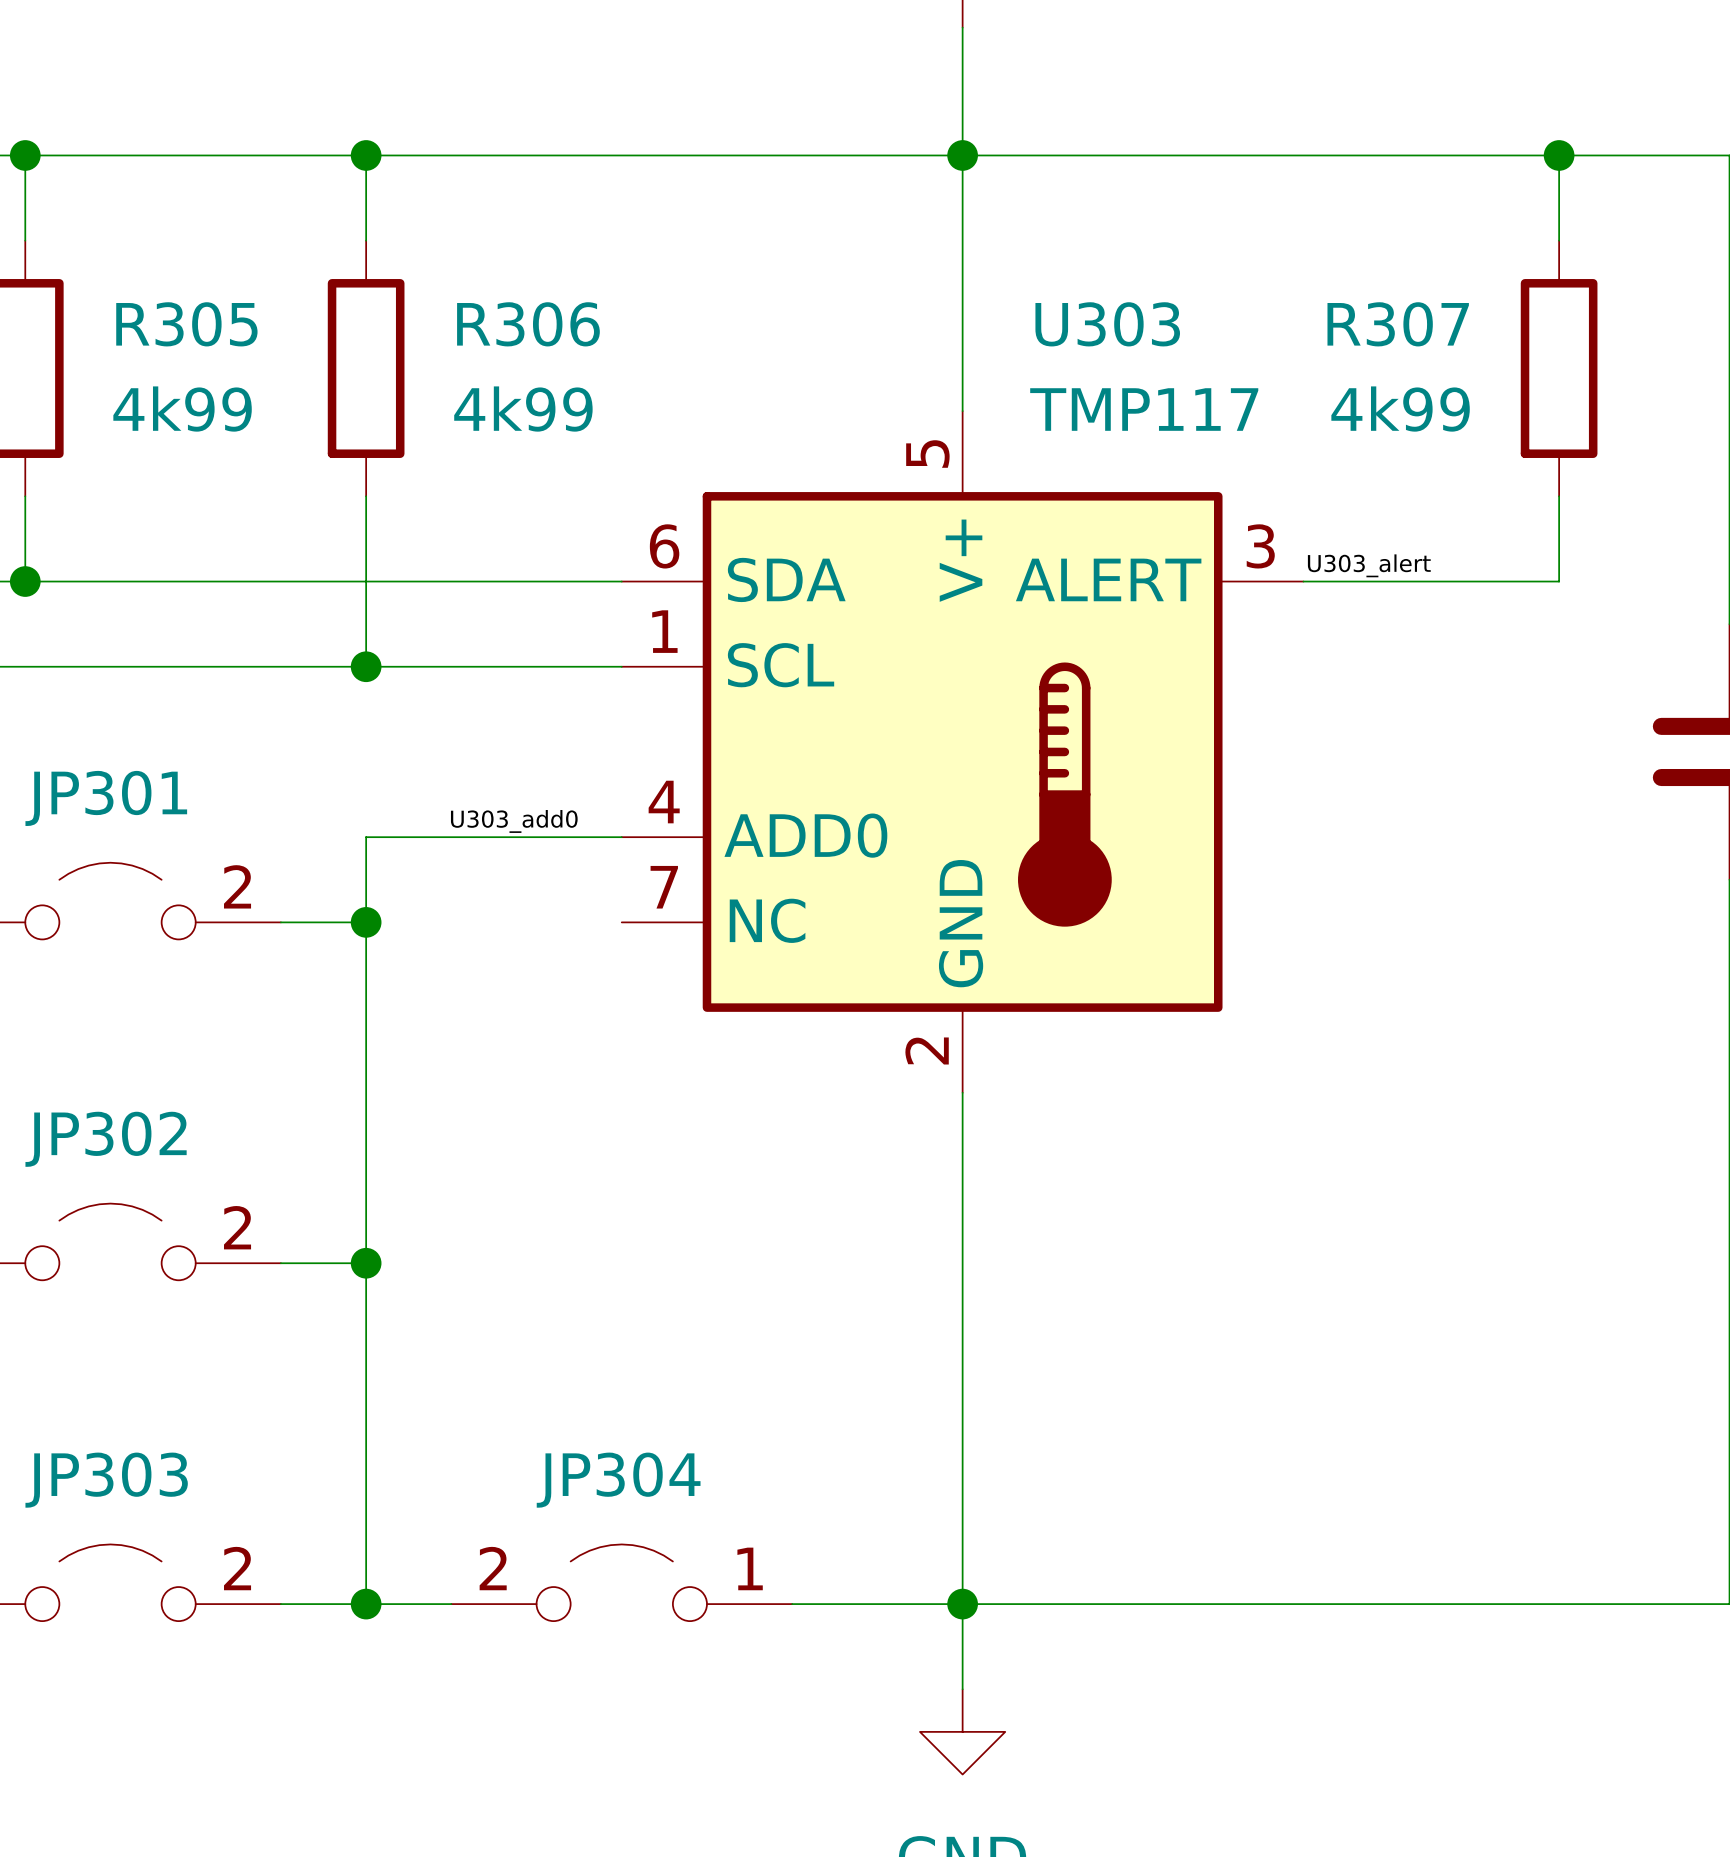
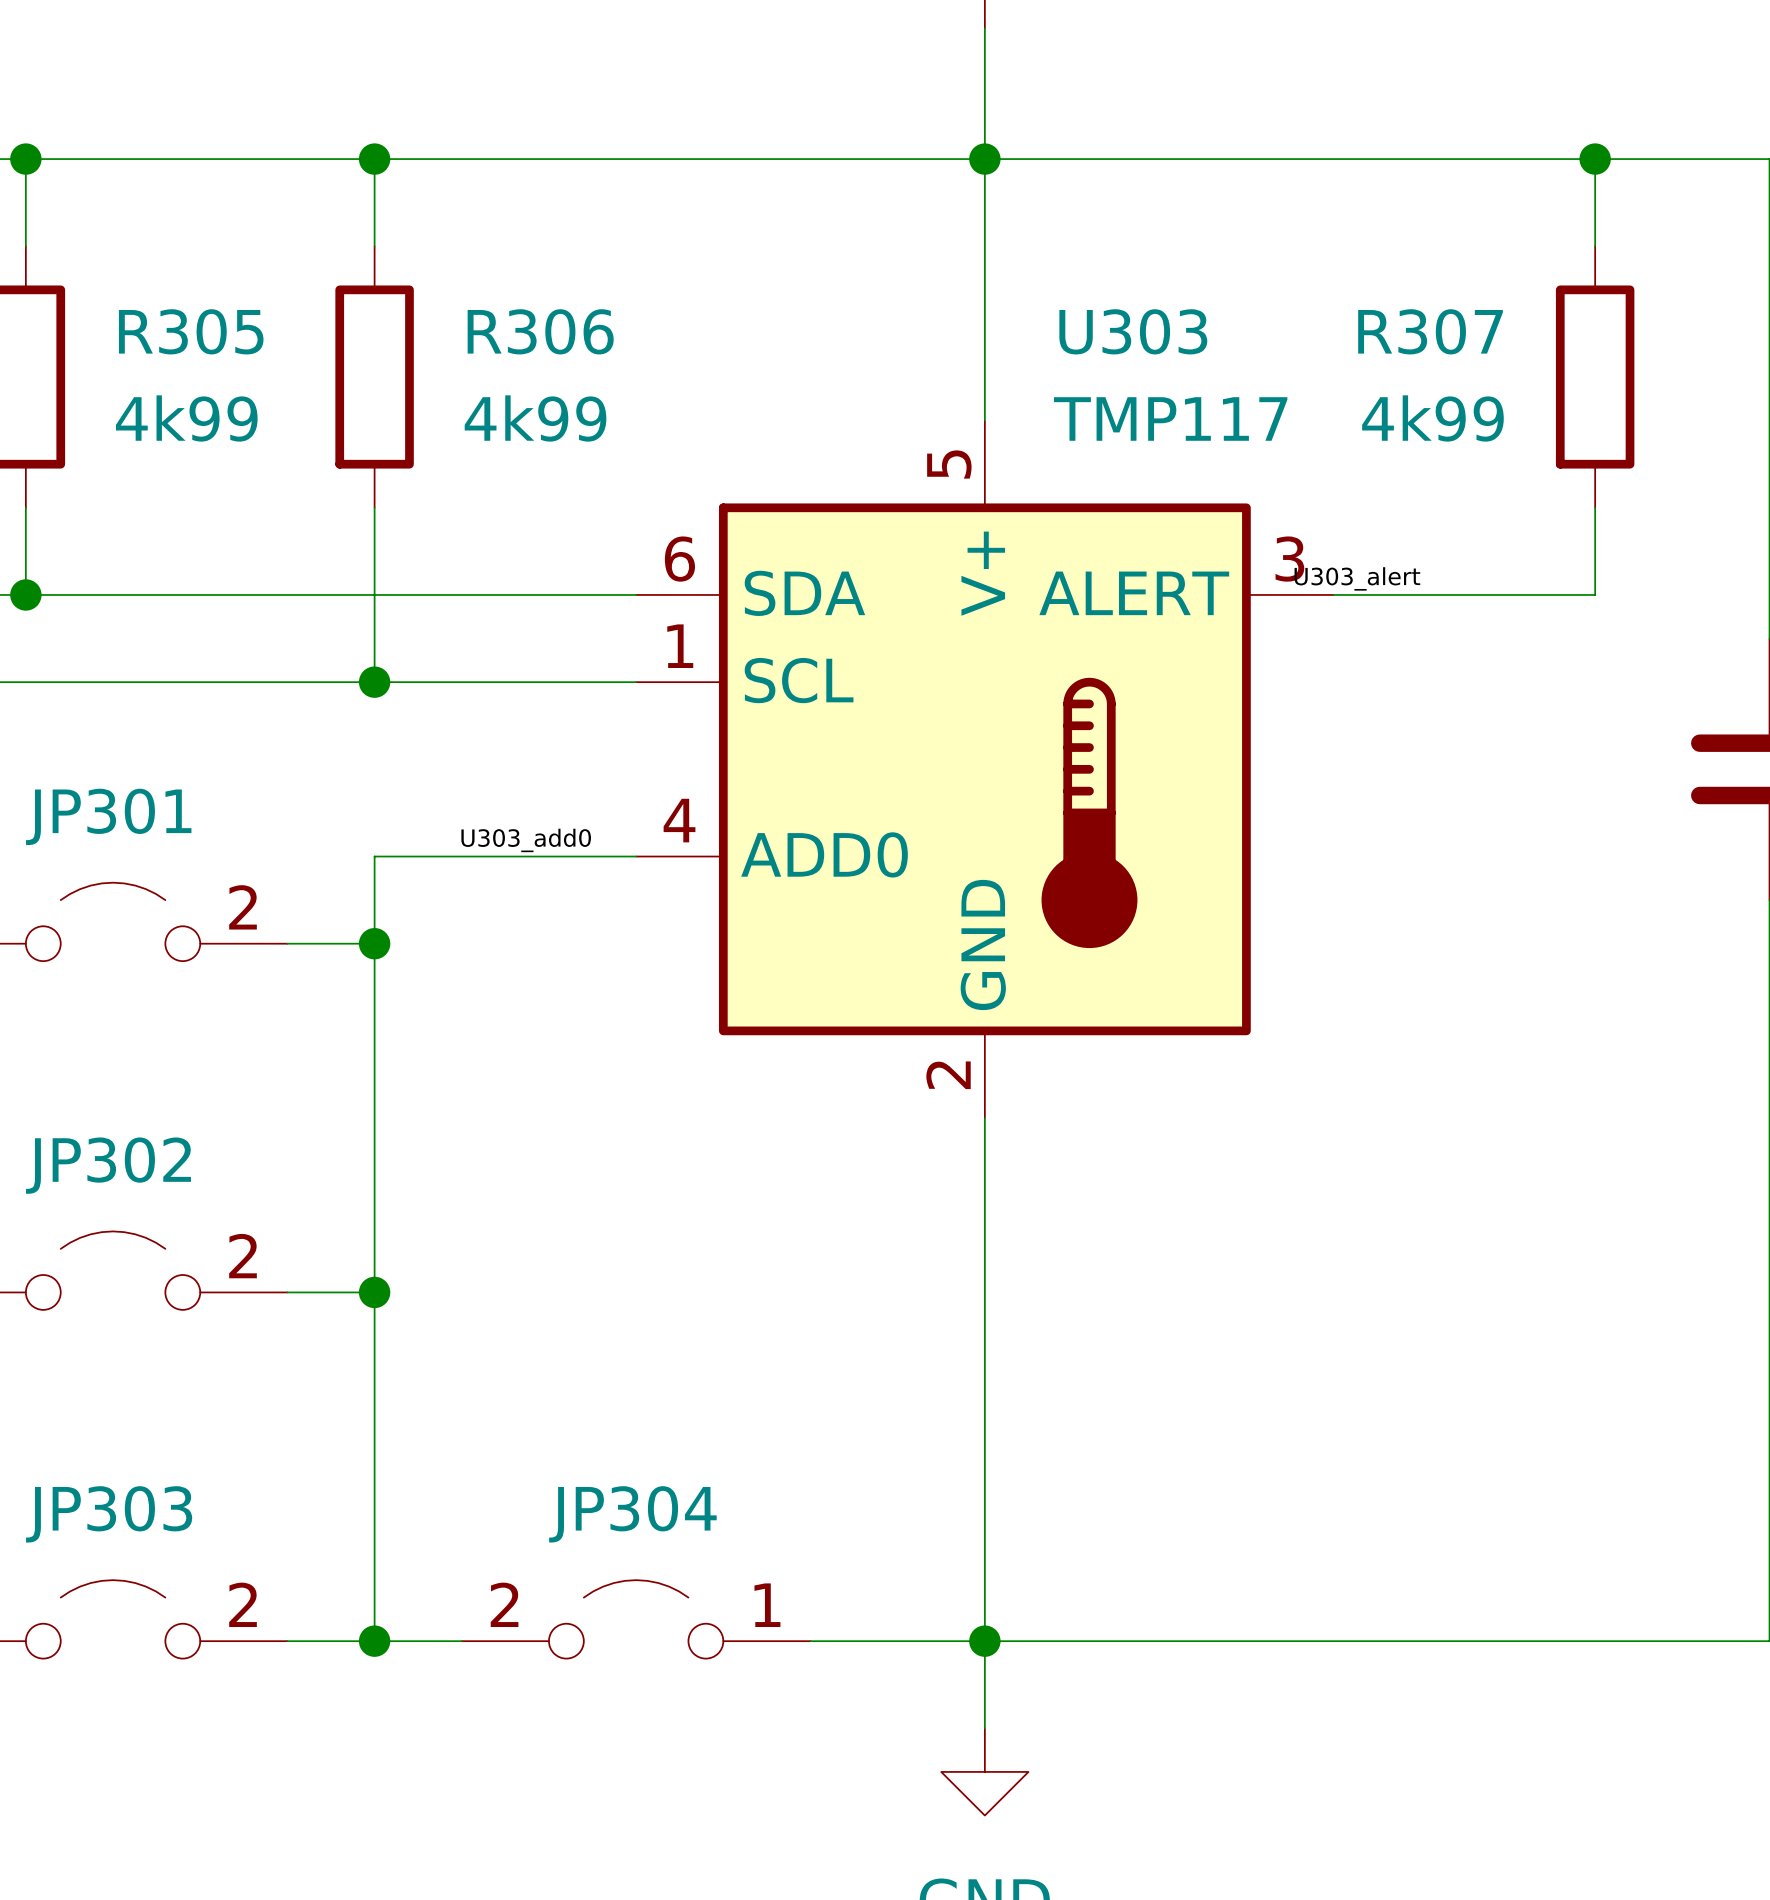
U303 symbol: [621, 411, 1304, 1093] -> [636, 420, 1334, 1119]
label position: U303_alert (1369, 565) -> U303_alert (1357, 578)

